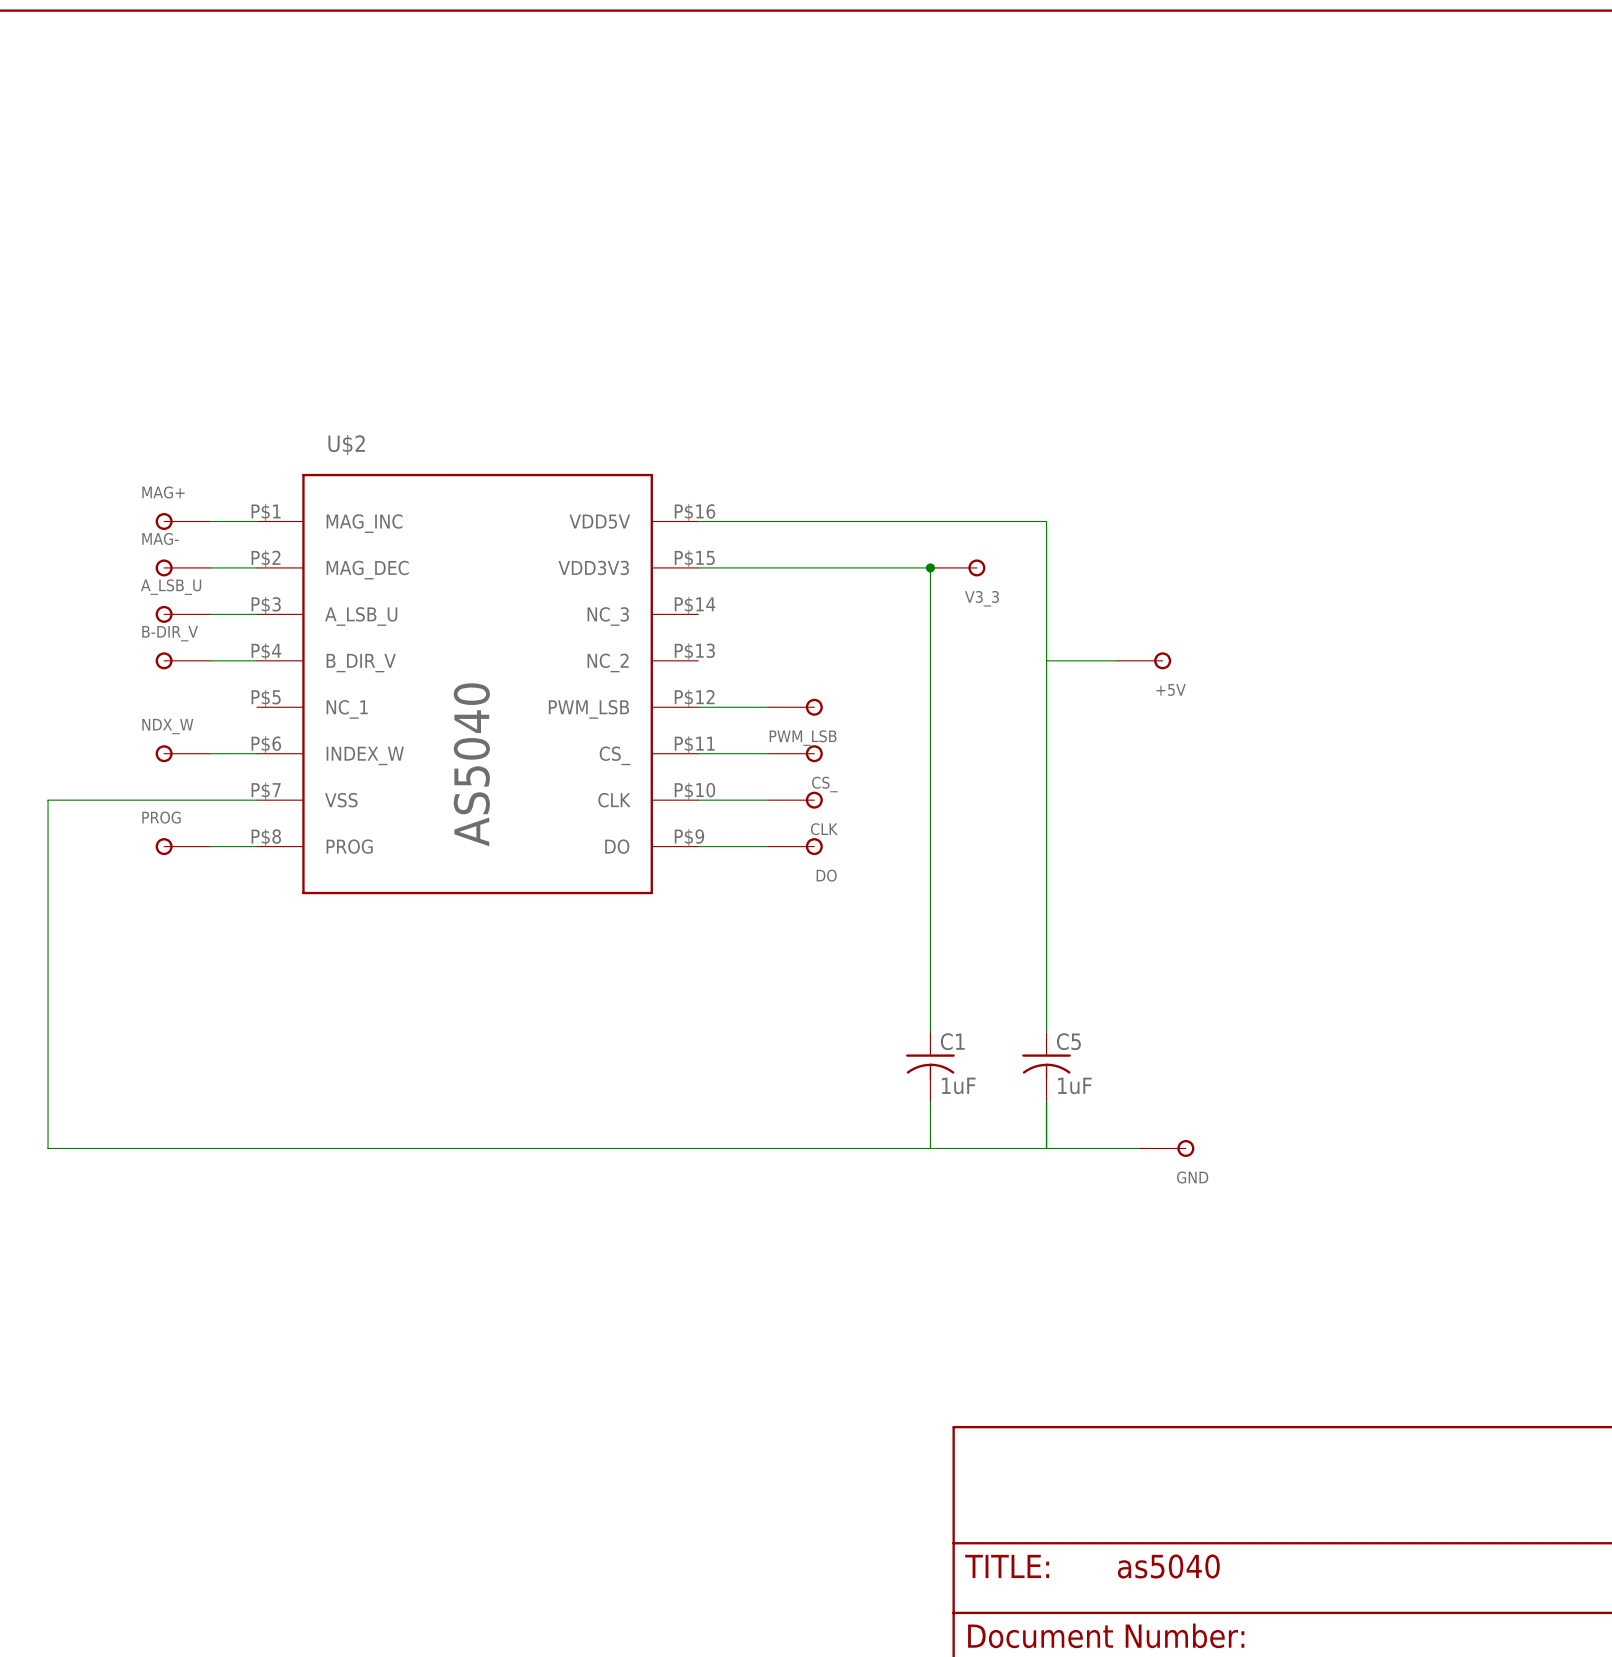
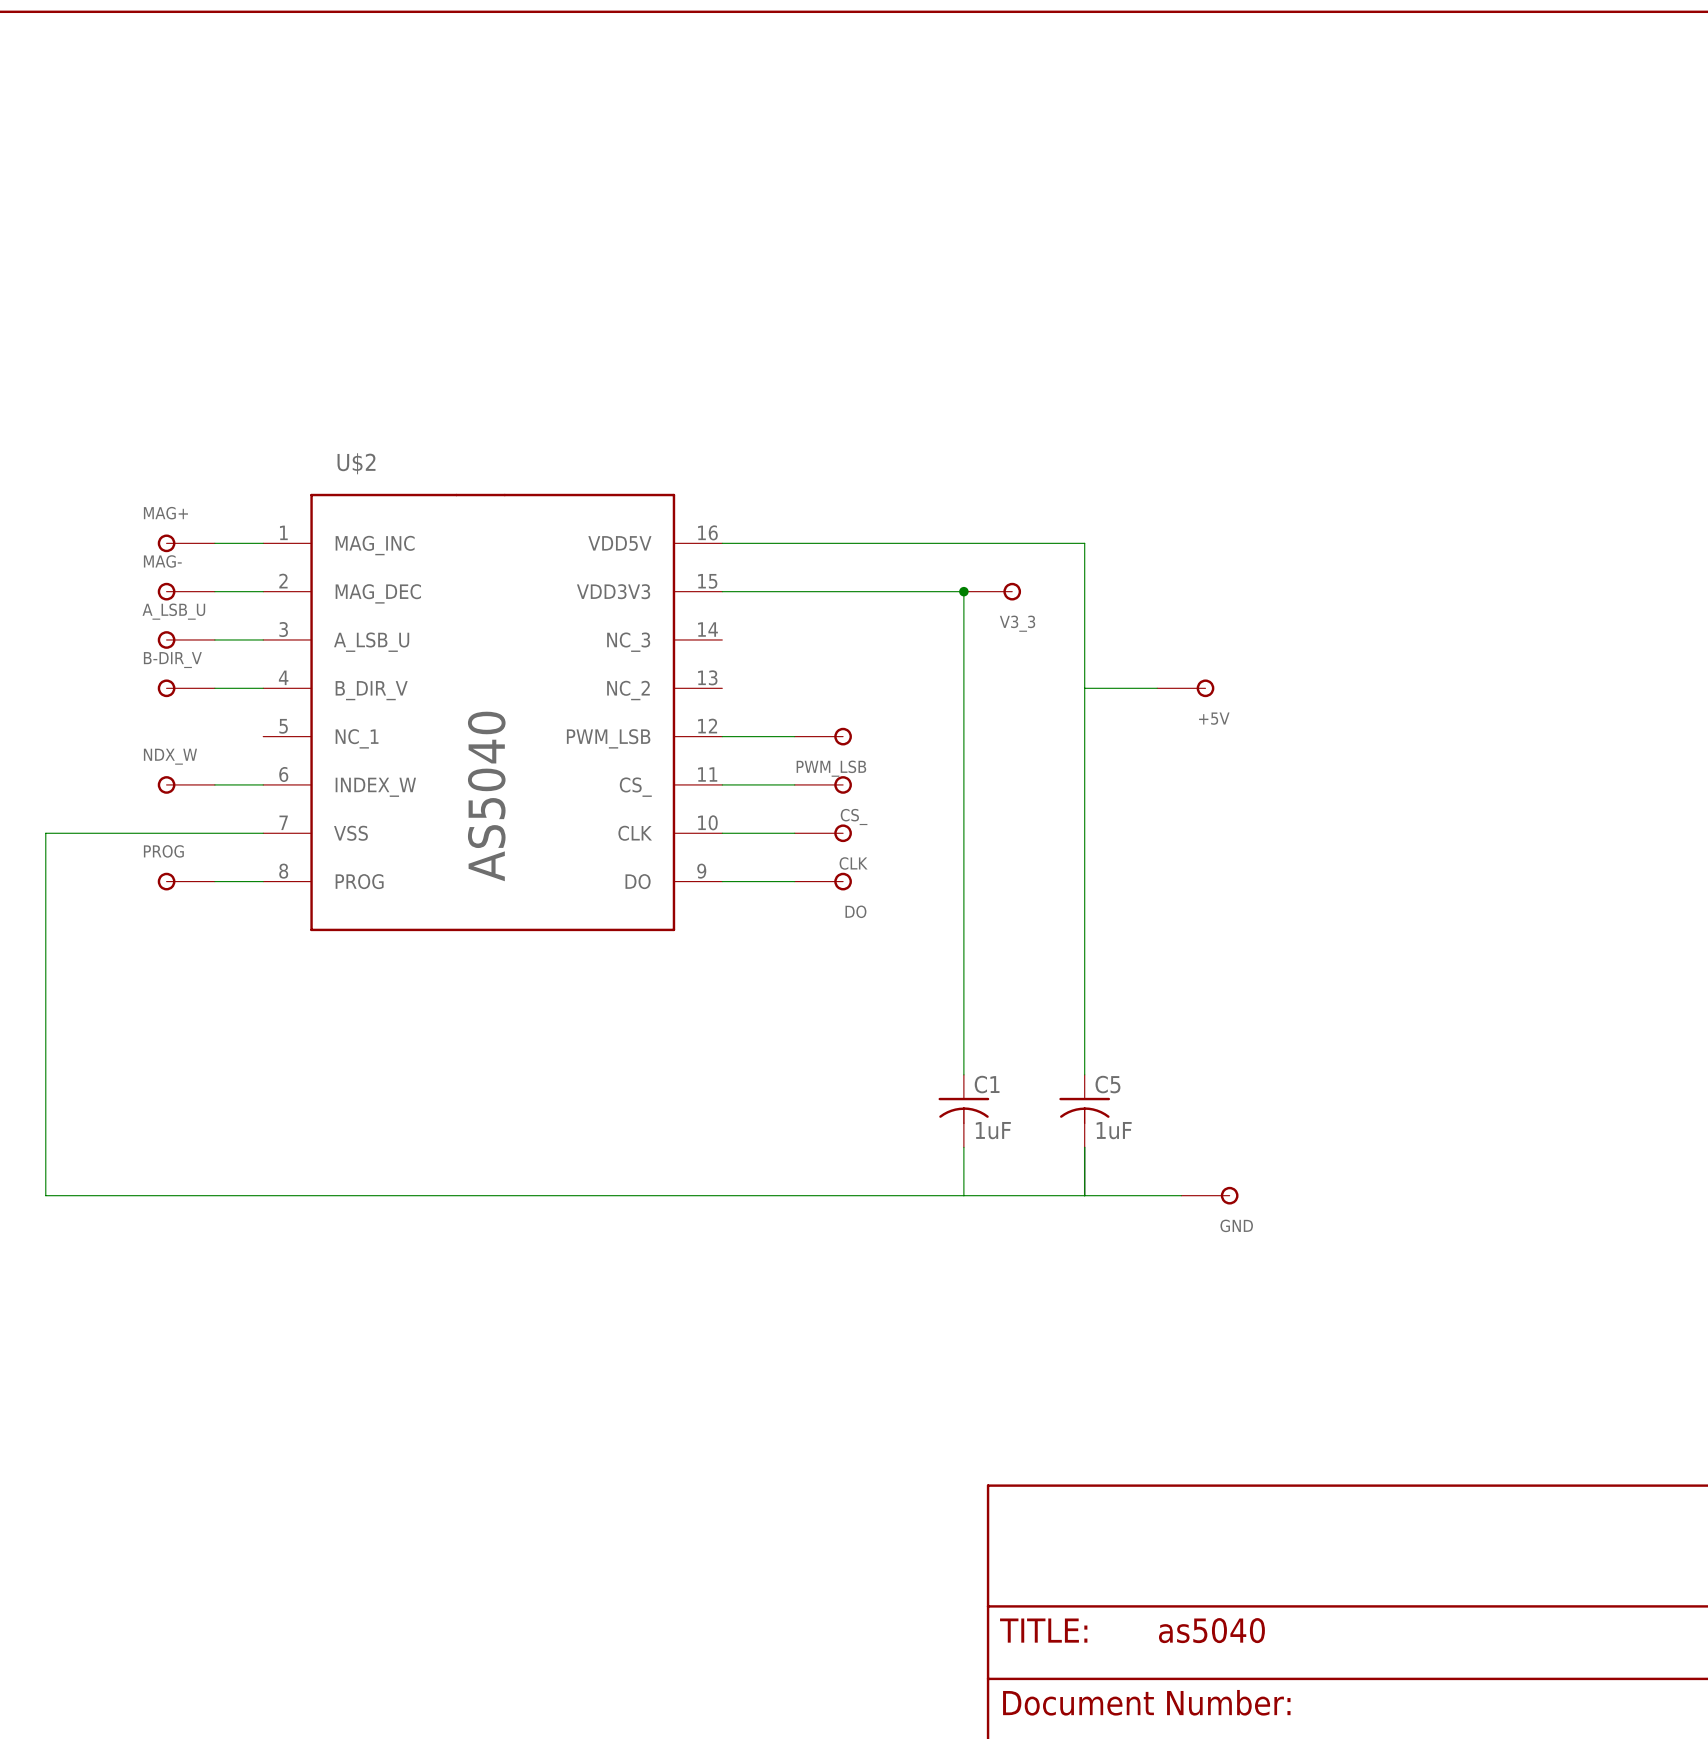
U$2 symbol: [257, 473, 699, 895] -> [263, 493, 723, 932]

